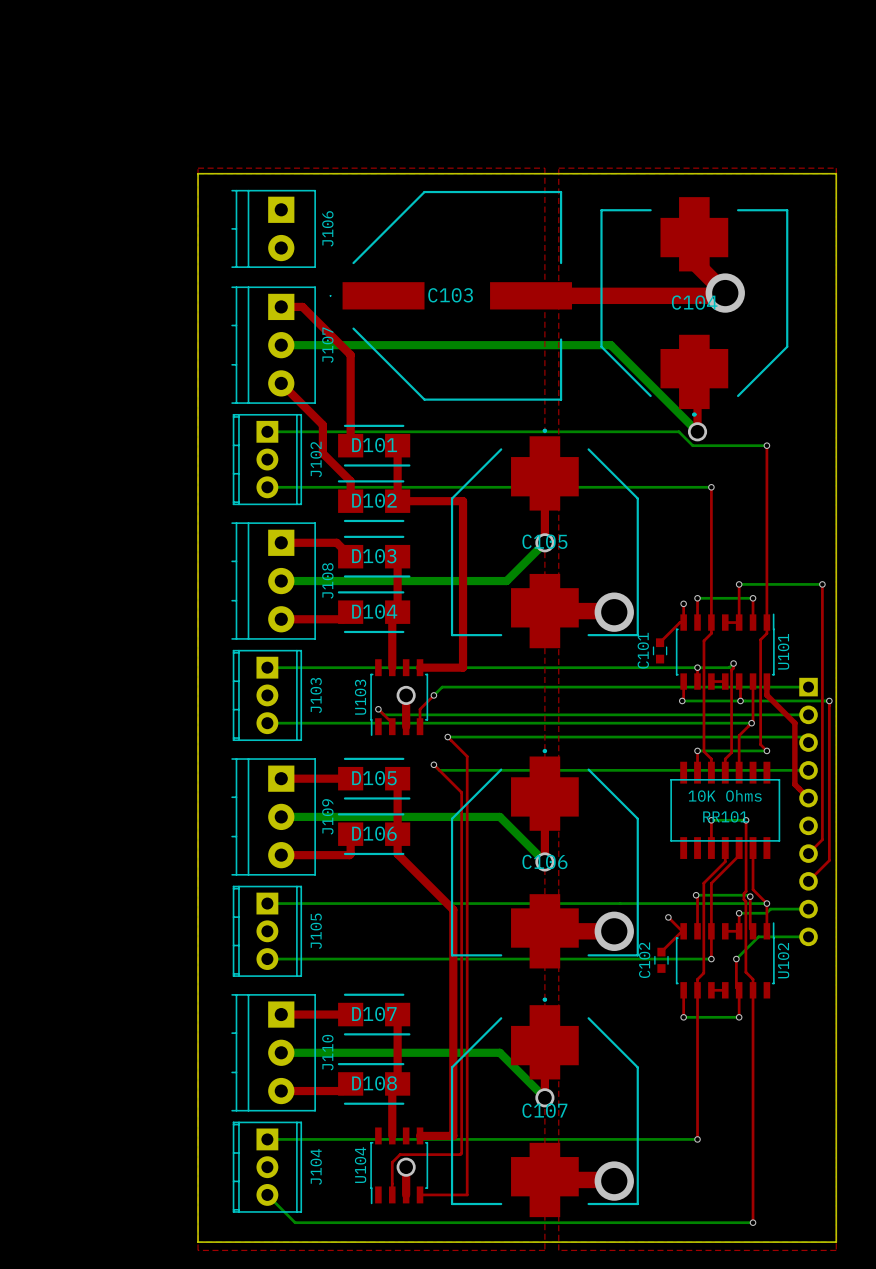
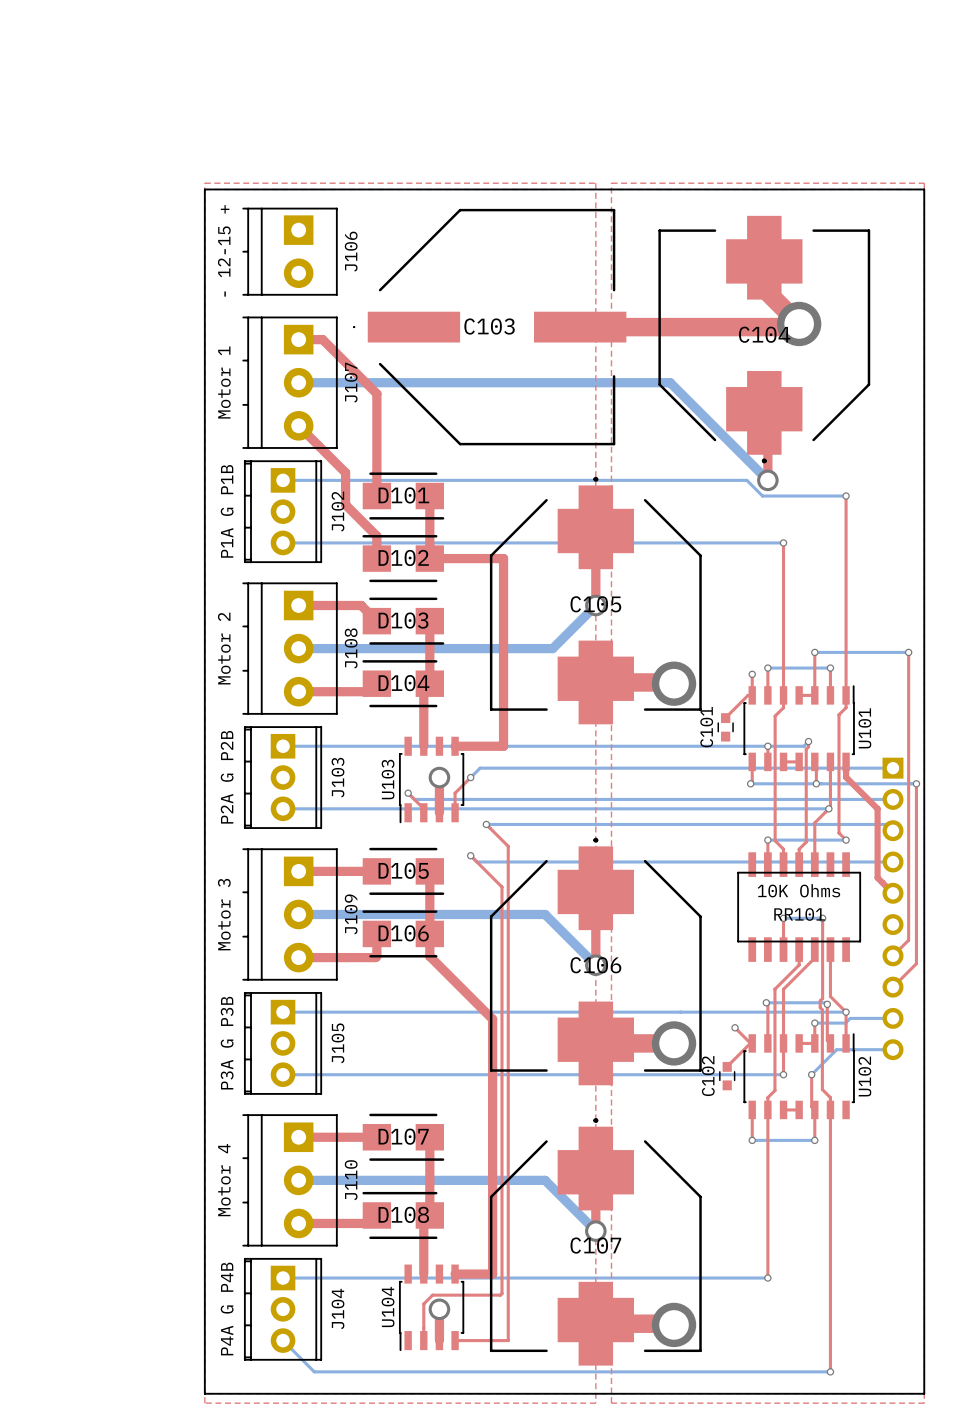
J106 value: none -> - 12-15 + (224, 250)
J107 value: none -> Motor 1 (224, 382)
J102 value: none -> P1A G P1B (227, 511)
J108 value: none -> Motor 2 (224, 648)
J103 value: none -> P2A G P2B (227, 777)
J109 value: none -> Motor 3 (224, 914)
J105 value: none -> P3A G P3B (227, 1043)
J110 value: none -> Motor 4 (224, 1180)
J104 value: none -> P4A G P4B (227, 1309)

